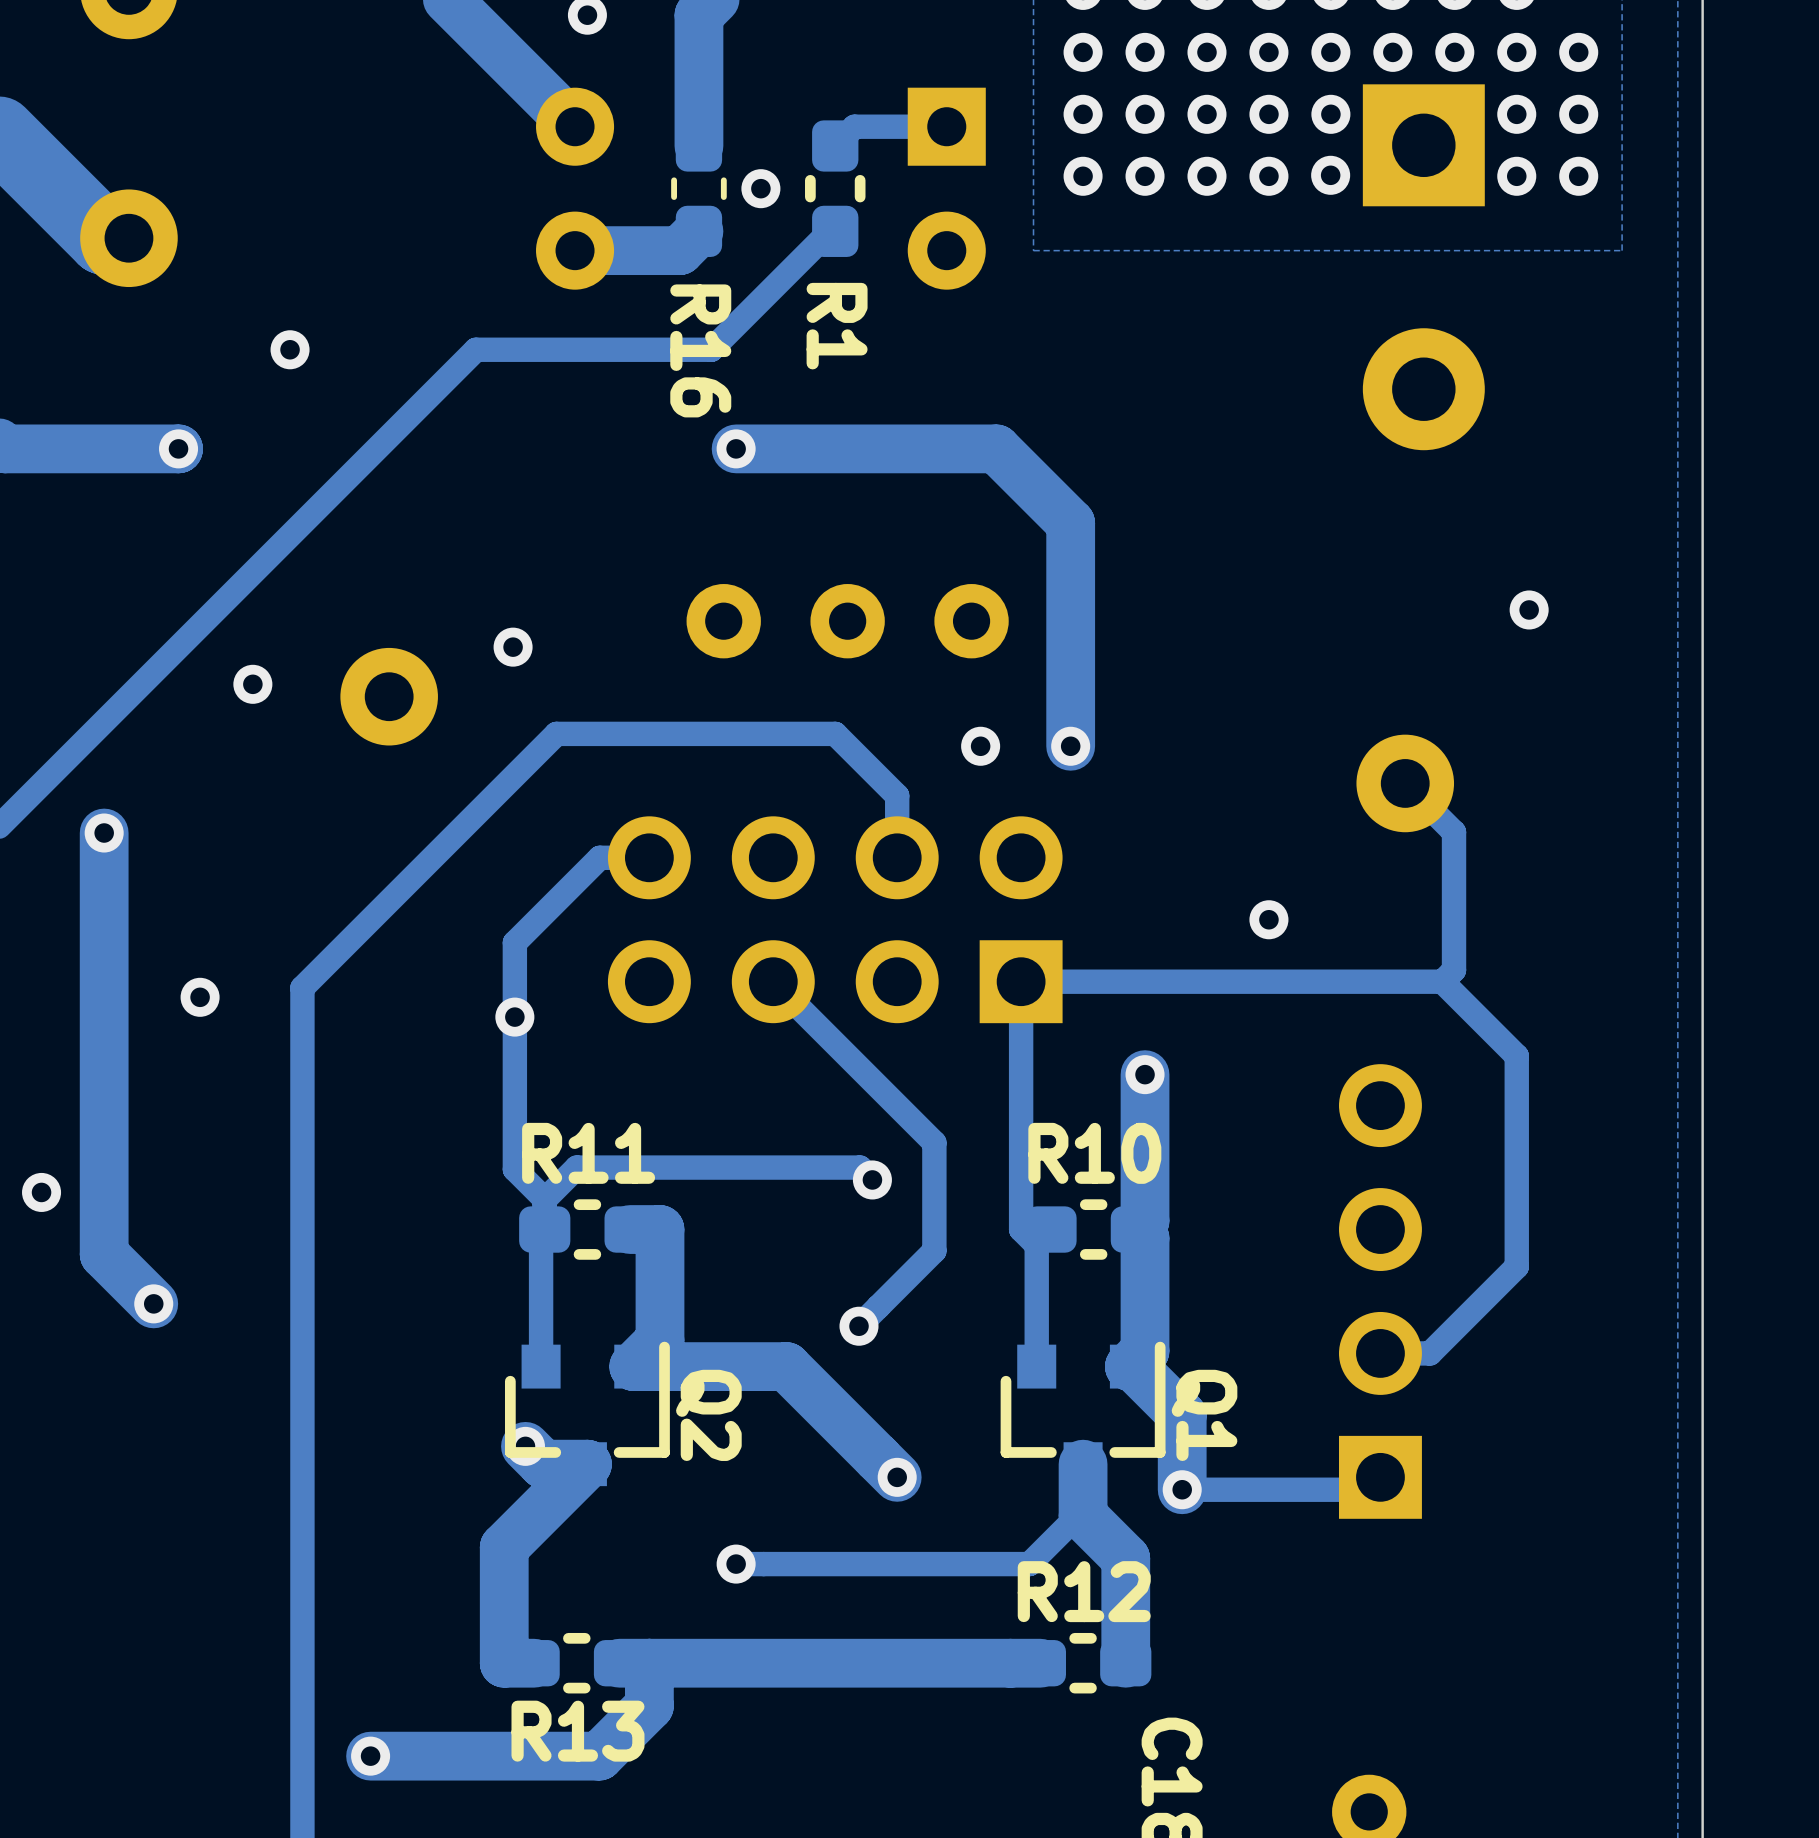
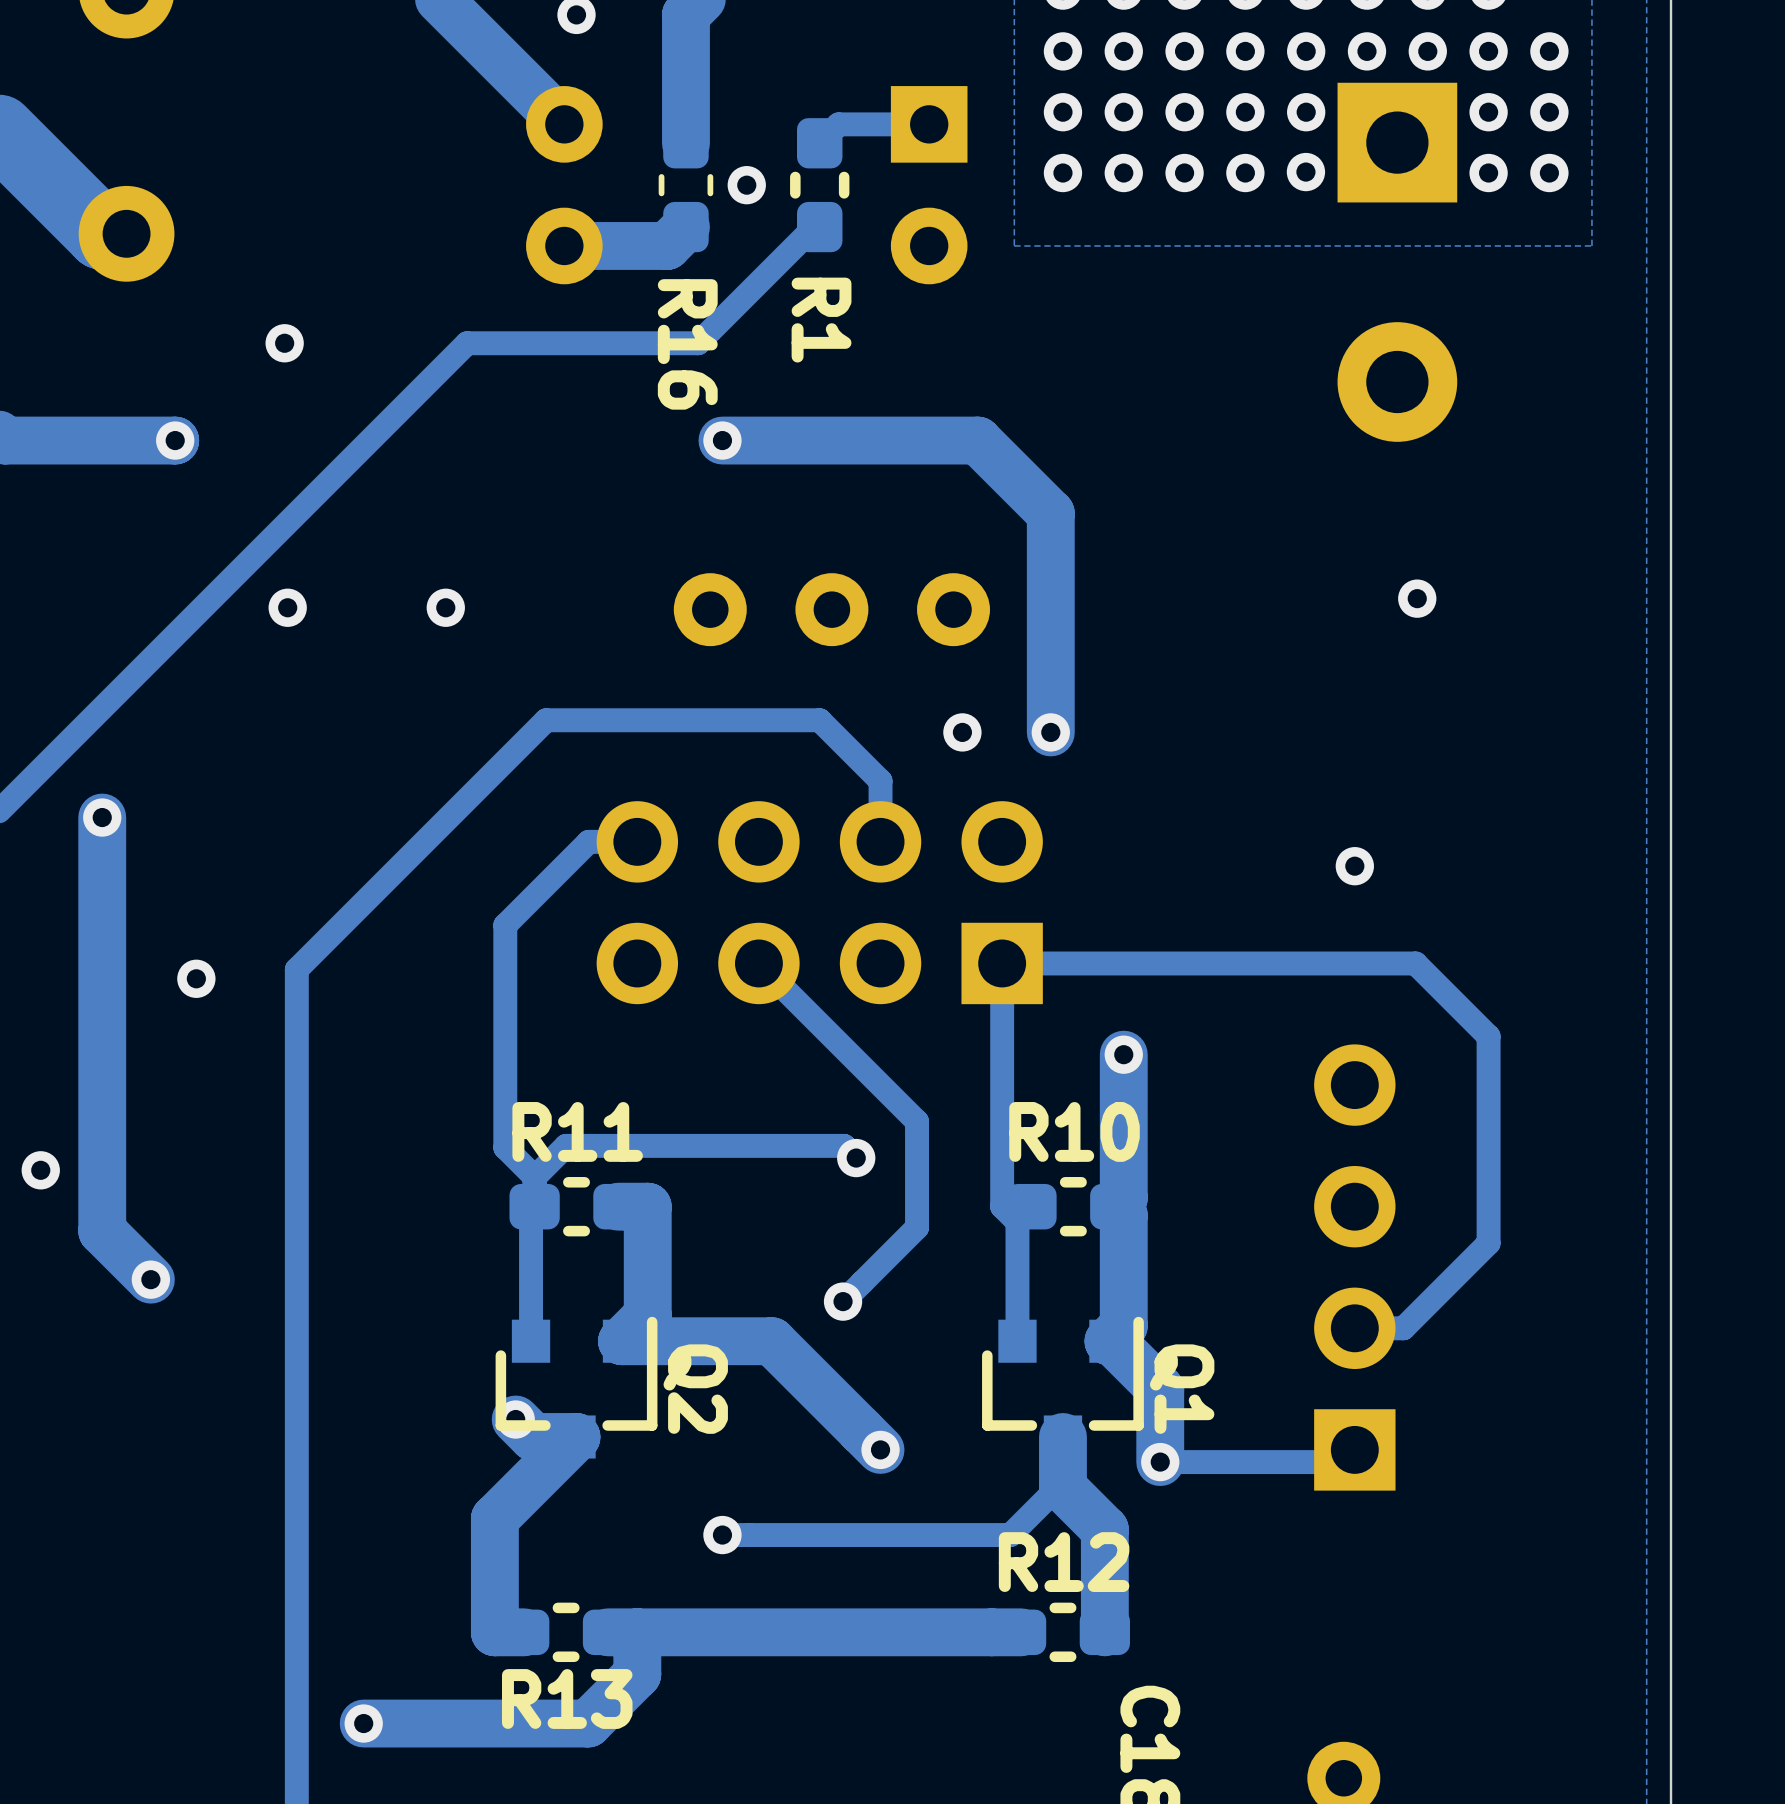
via position: (1529, 609) -> (1417, 598)
via position: (513, 647) -> (445, 607)
via position: (252, 684) -> (287, 607)
part: (389, 696) -> none
track: (1405, 783) (1454, 832) (1454, 970) (1442, 981) -> none
part: (1405, 783) -> none
via position: (1268, 919) -> (1354, 866)
via: (514, 1017) -> none

